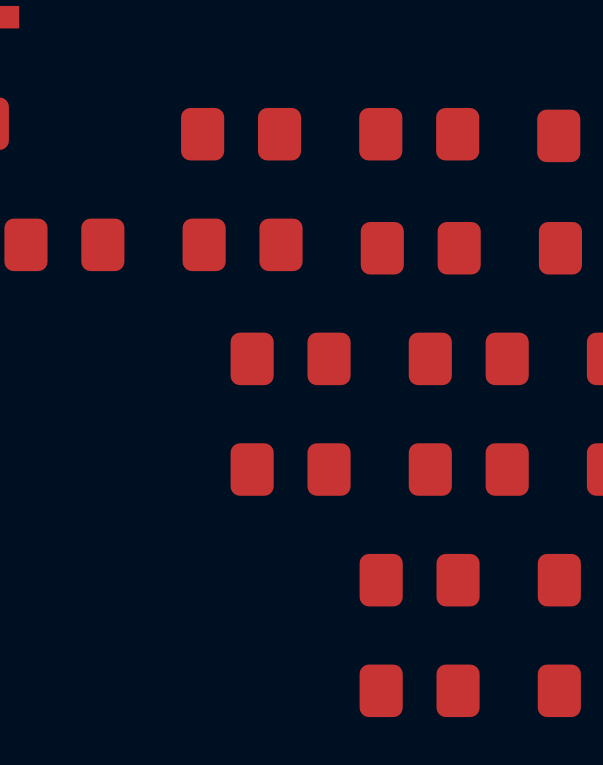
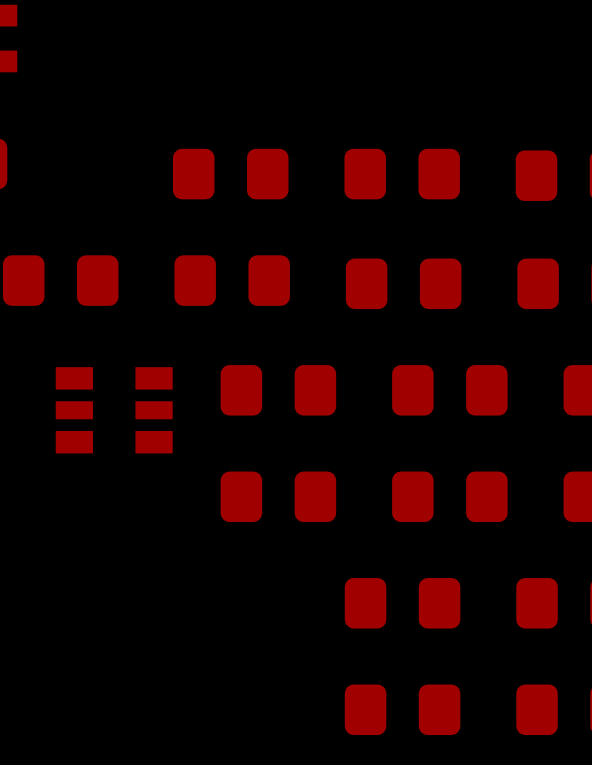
part: none -> (114, 410)

